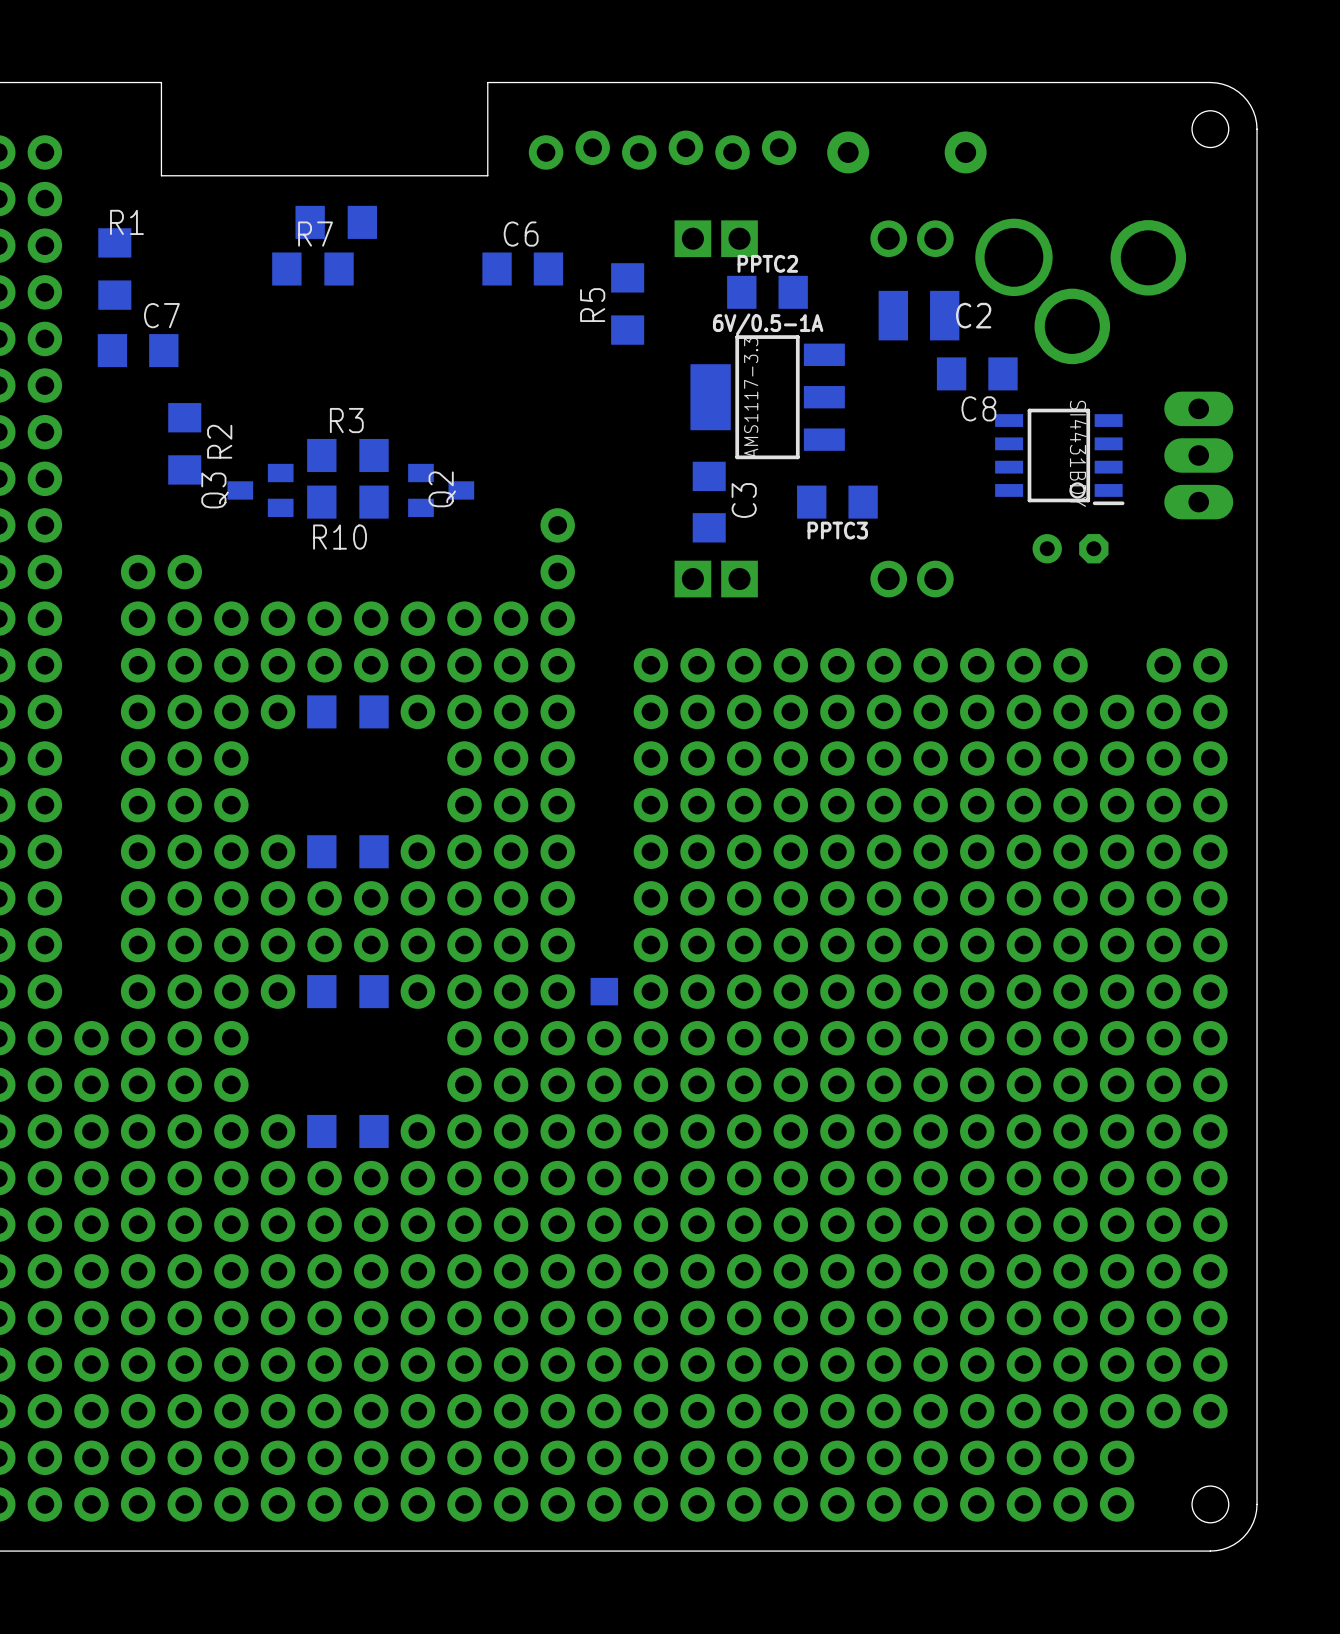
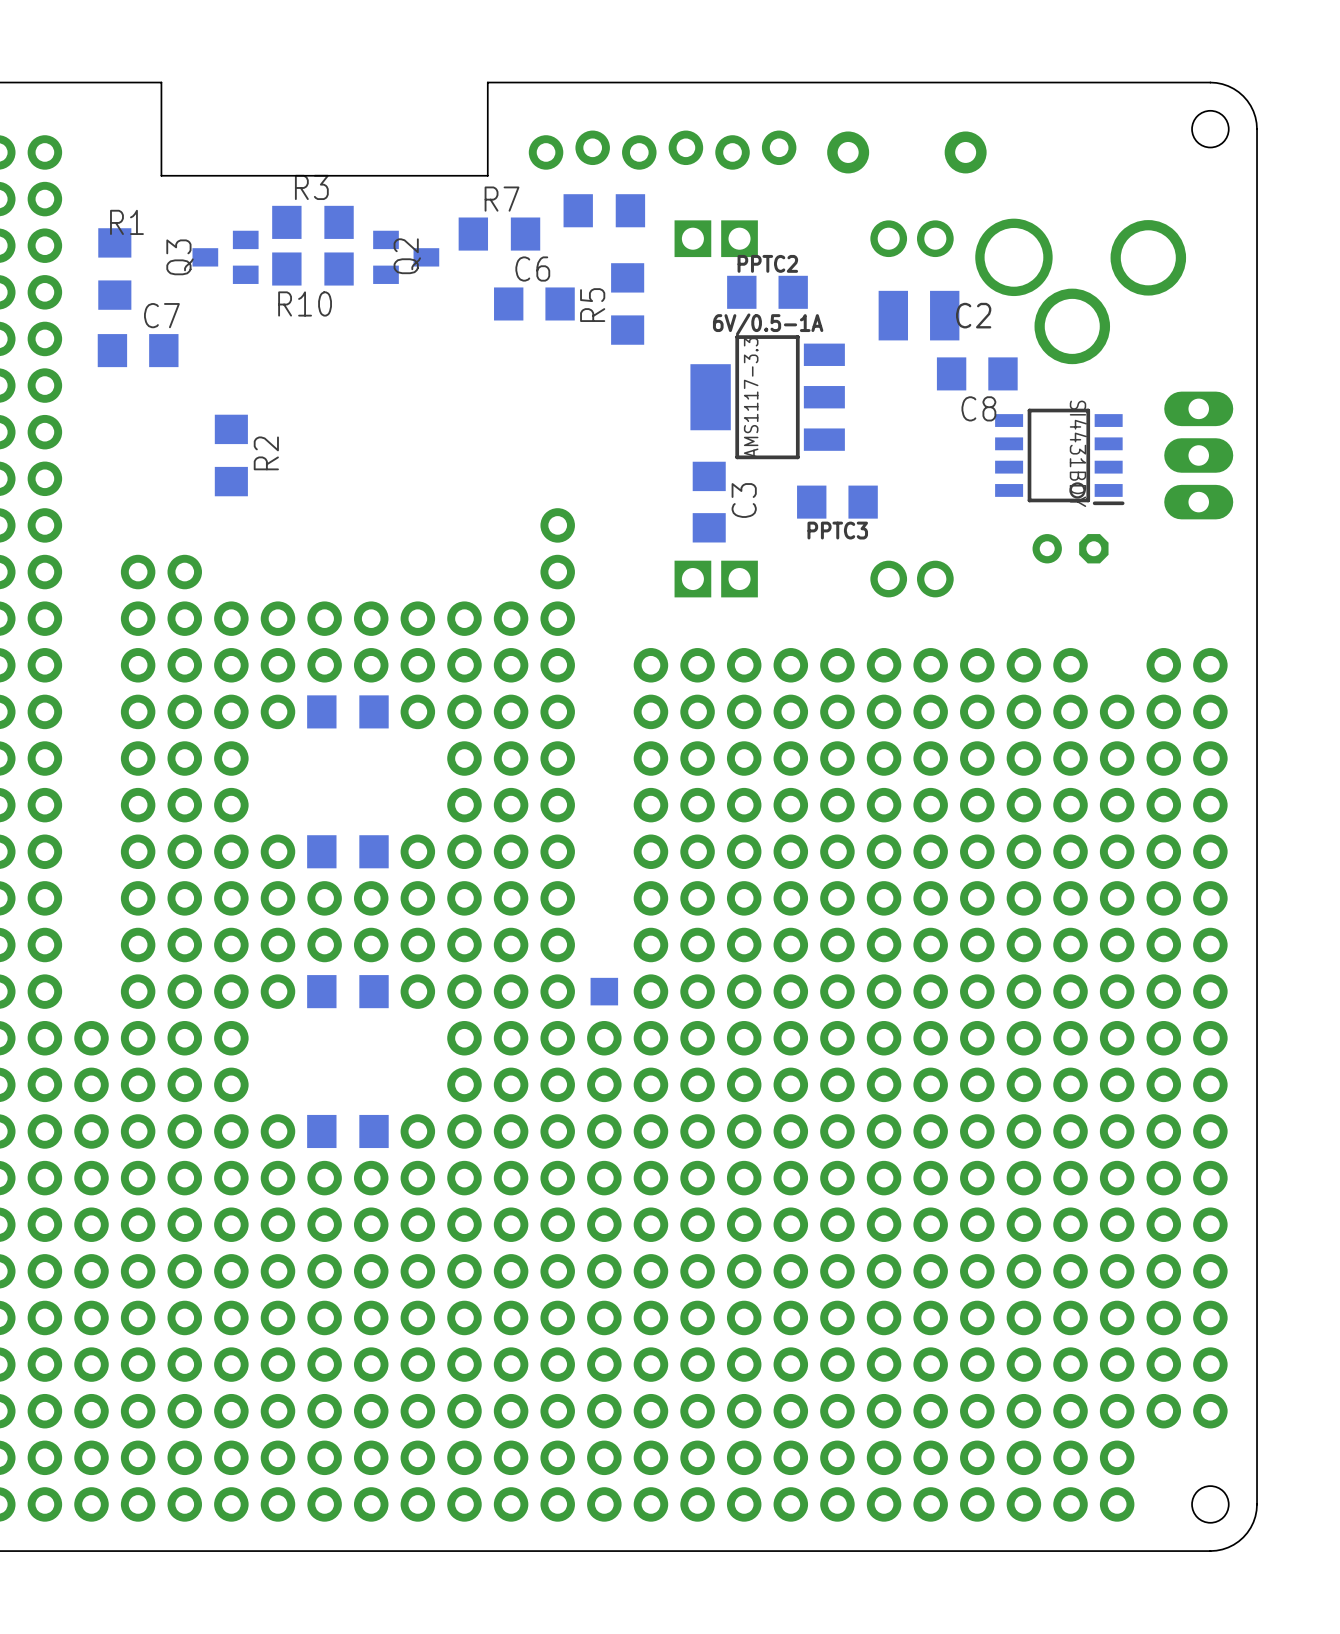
part position: (336, 222) -> (604, 210)
R7 name: R7 (315, 234) -> R10 (305, 303)
R7: none -> (499, 234)
C6 position: (522, 269) -> (534, 303)
R2 position: (184, 443) -> (231, 455)
R3 position: (347, 455) -> (312, 222)
Q3 position: (260, 490) -> (225, 257)
Q2 position: (441, 490) -> (406, 257)
R10: (347, 502) -> none

